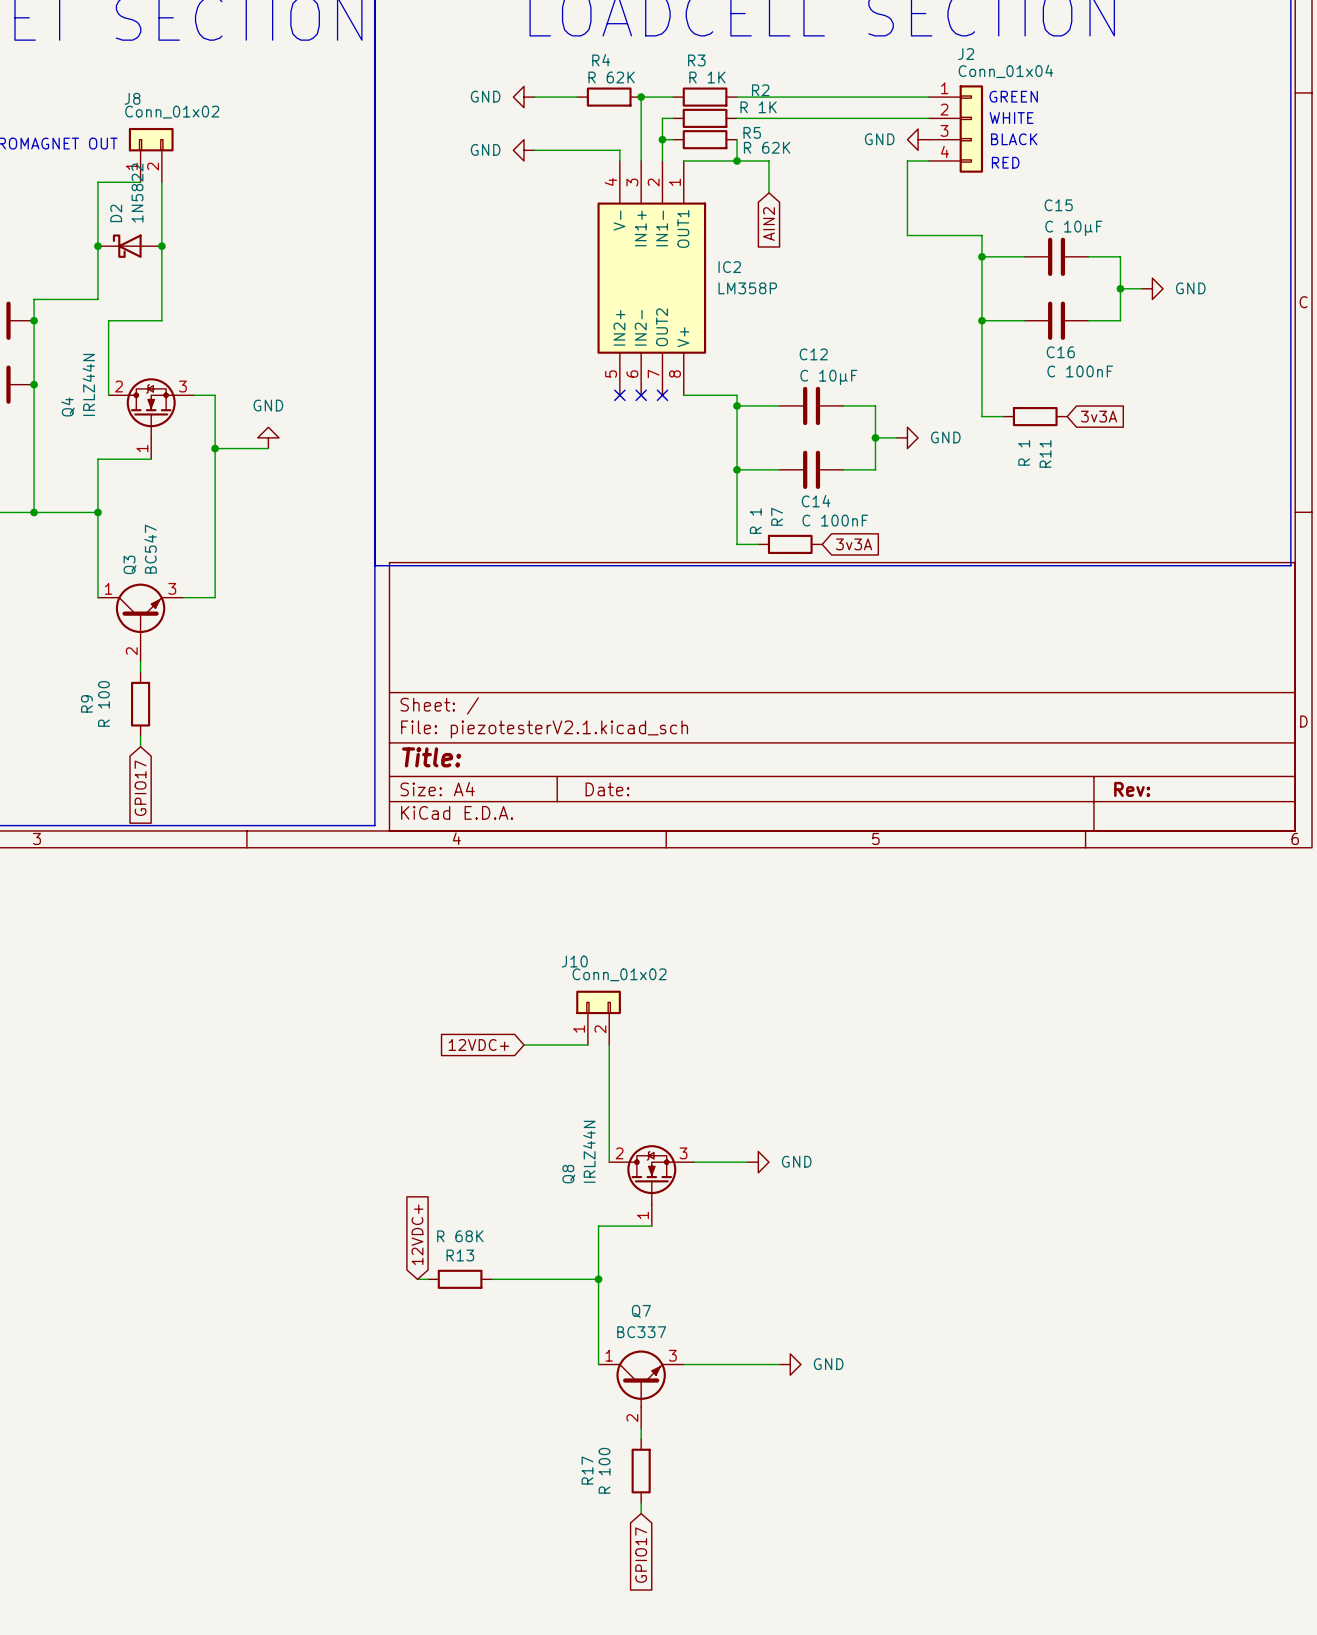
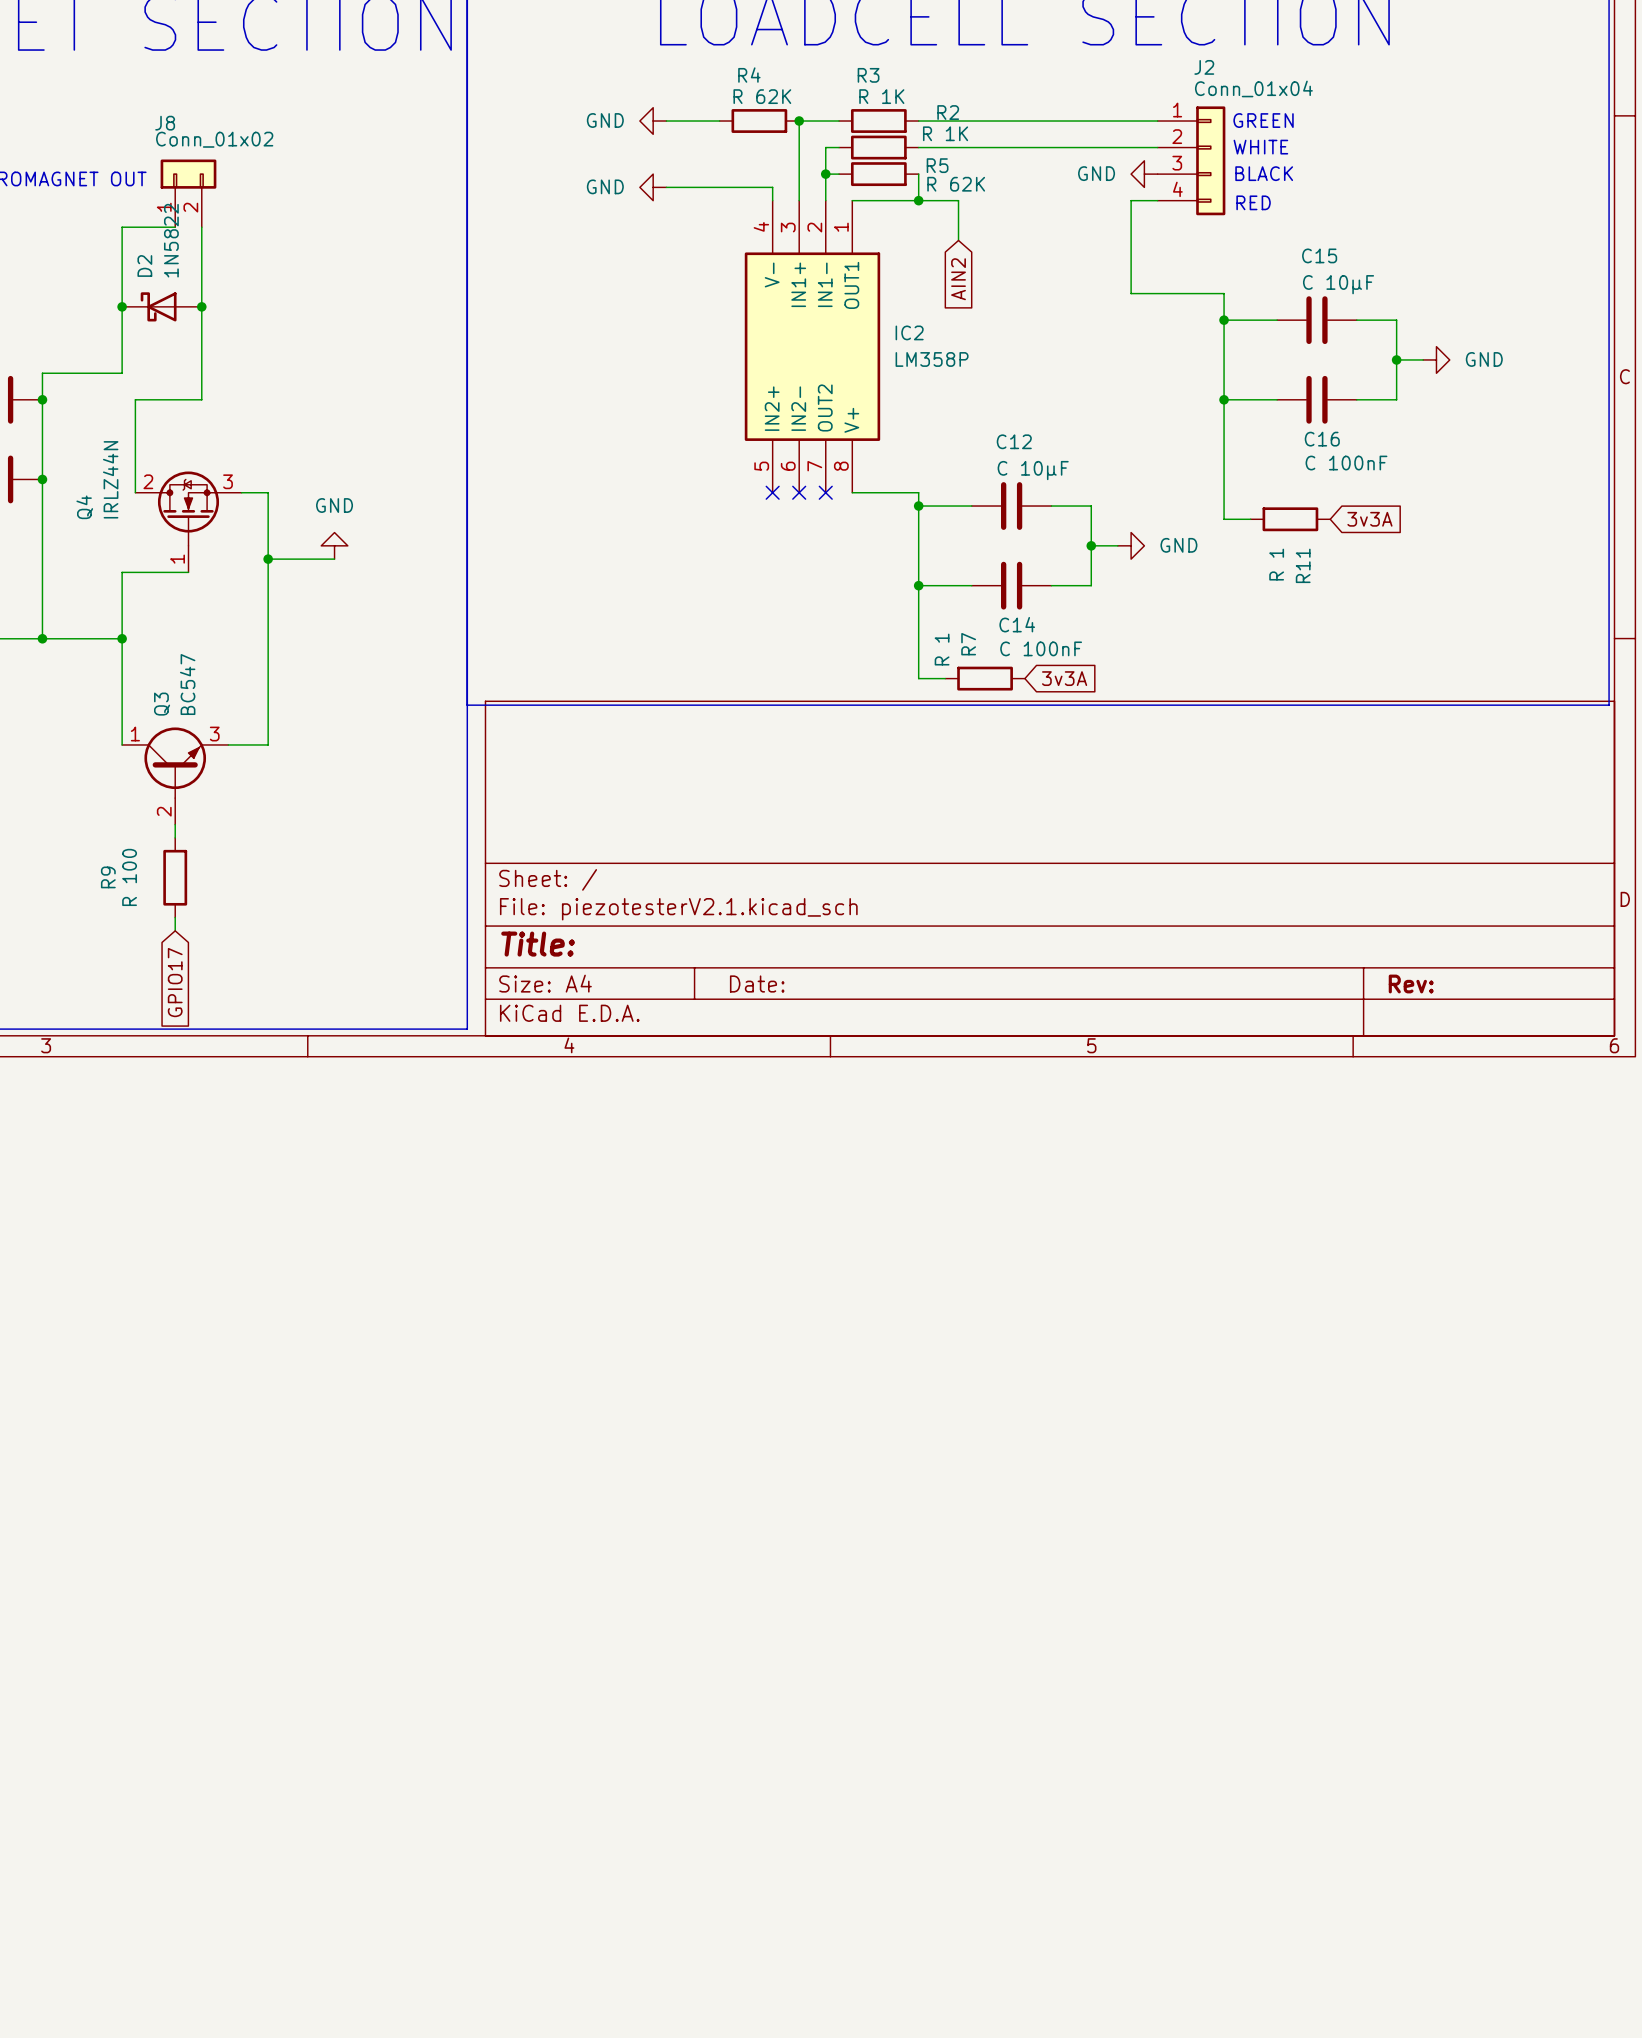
J10: Conn_01x02 (598, 1017) -> none
global label: 12VDC+ (478, 1045) -> none
wire: (524, 1045) (587, 1045) -> none
wire: (609, 1045) (609, 1162) -> none
wire: (694, 1162) (747, 1162) -> none
power symbol: GND (758, 1162) -> none
Q8: IRLZ44N (651, 1185) -> none
wire: (651, 1226) (598, 1226) (598, 1364) -> none
global label: 12VDC+ (417, 1234) -> none
wire: (417, 1279) (428, 1279) -> none
R13: R 68K (460, 1279) -> none
wire: (492, 1279) (598, 1279) -> none
junction: (598, 1279) -> none
wire: (683, 1364) (779, 1364) -> none
power symbol: GND (790, 1364) -> none
Q7: BC337 (641, 1389) -> none
wire: (641, 1428) (641, 1439) -> none
R17: R 100 (641, 1471) -> none
wire: (641, 1502) (641, 1513) -> none
global label: GPIO17 (641, 1555) -> none

